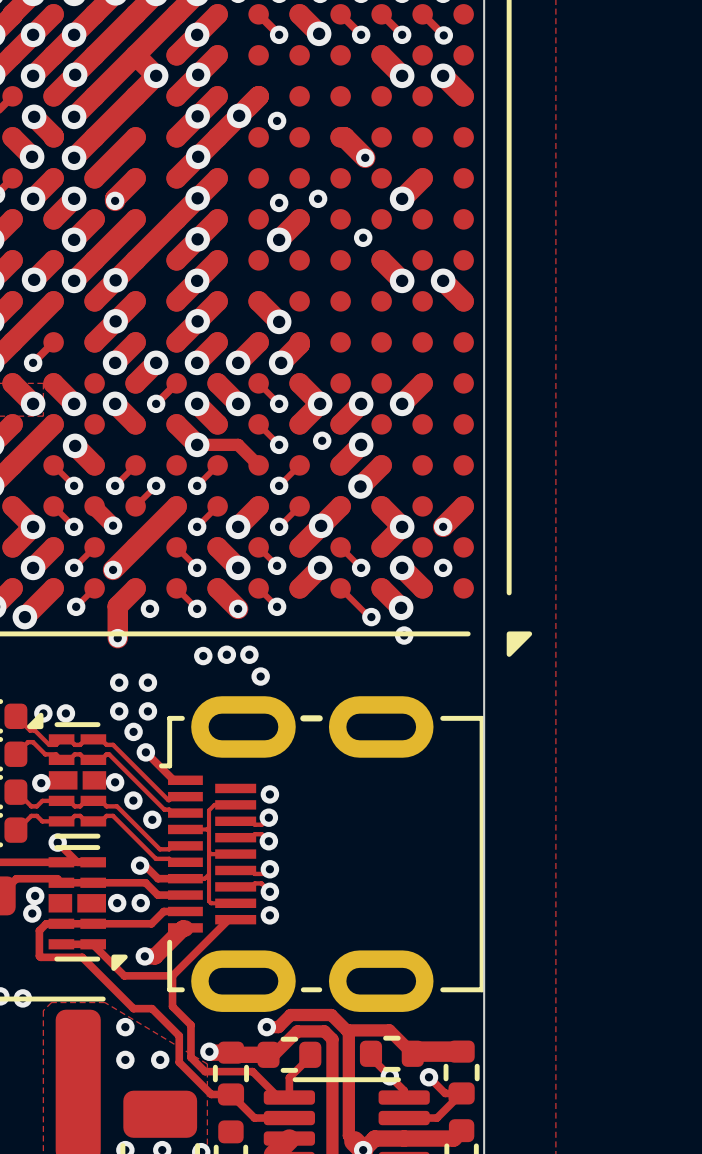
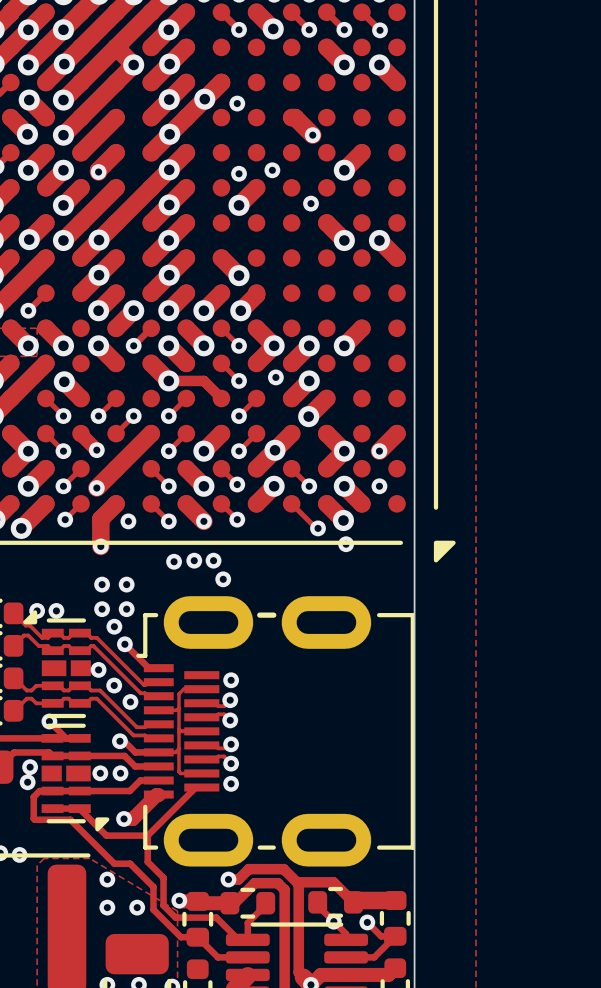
via: (41, 783) -> none

